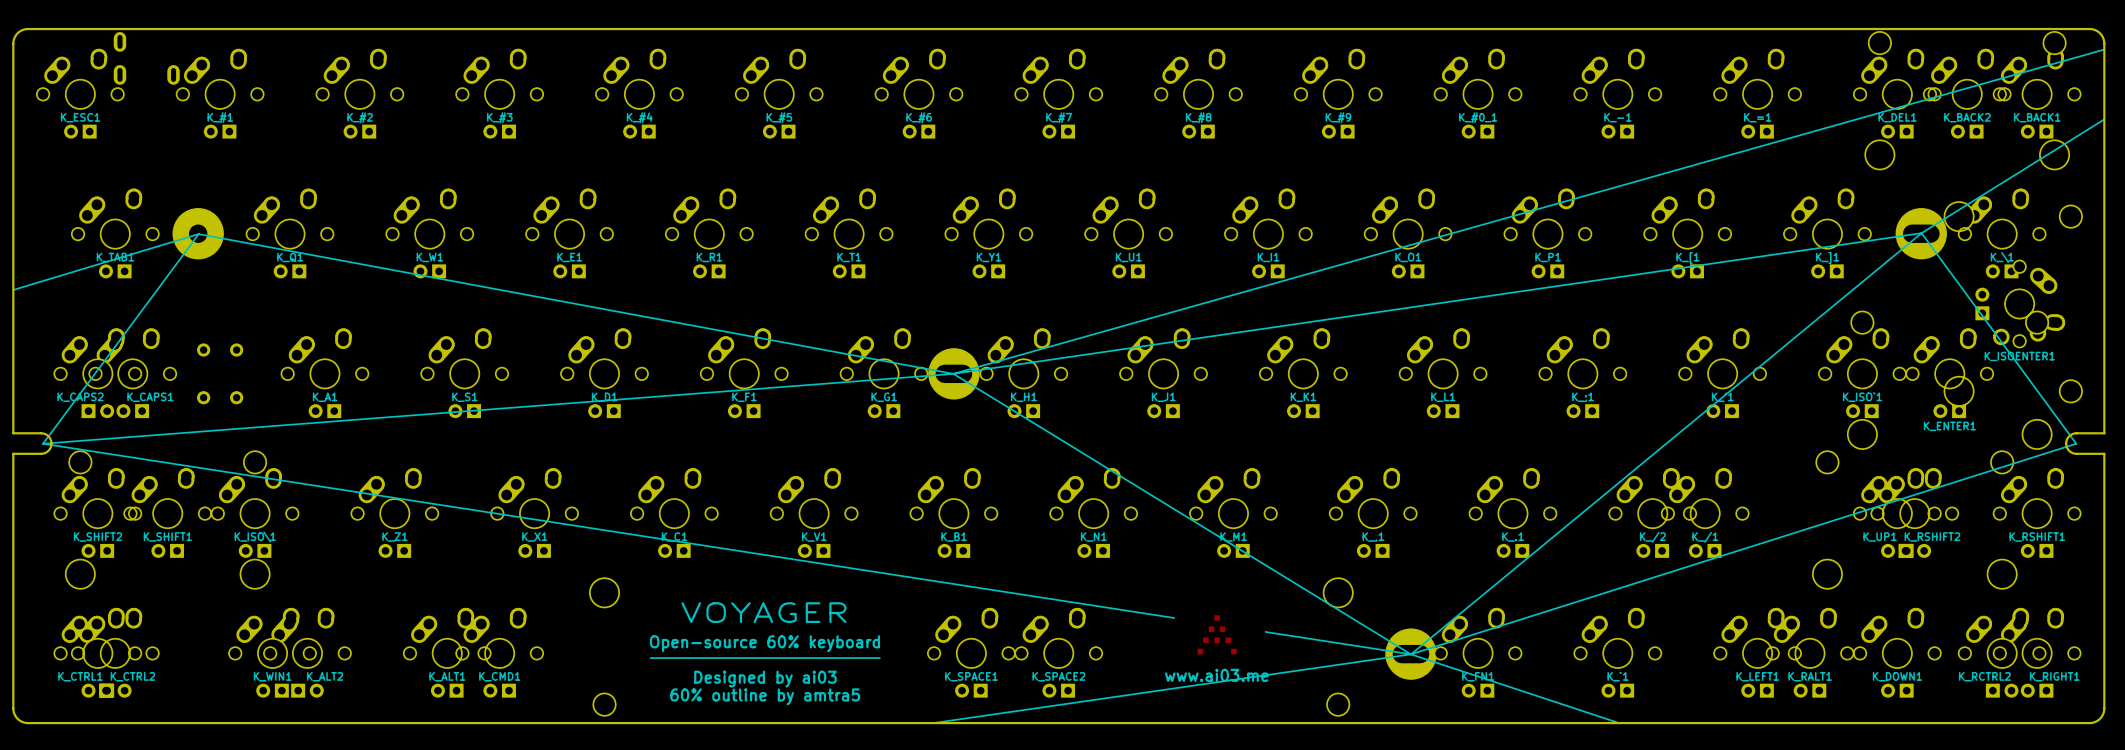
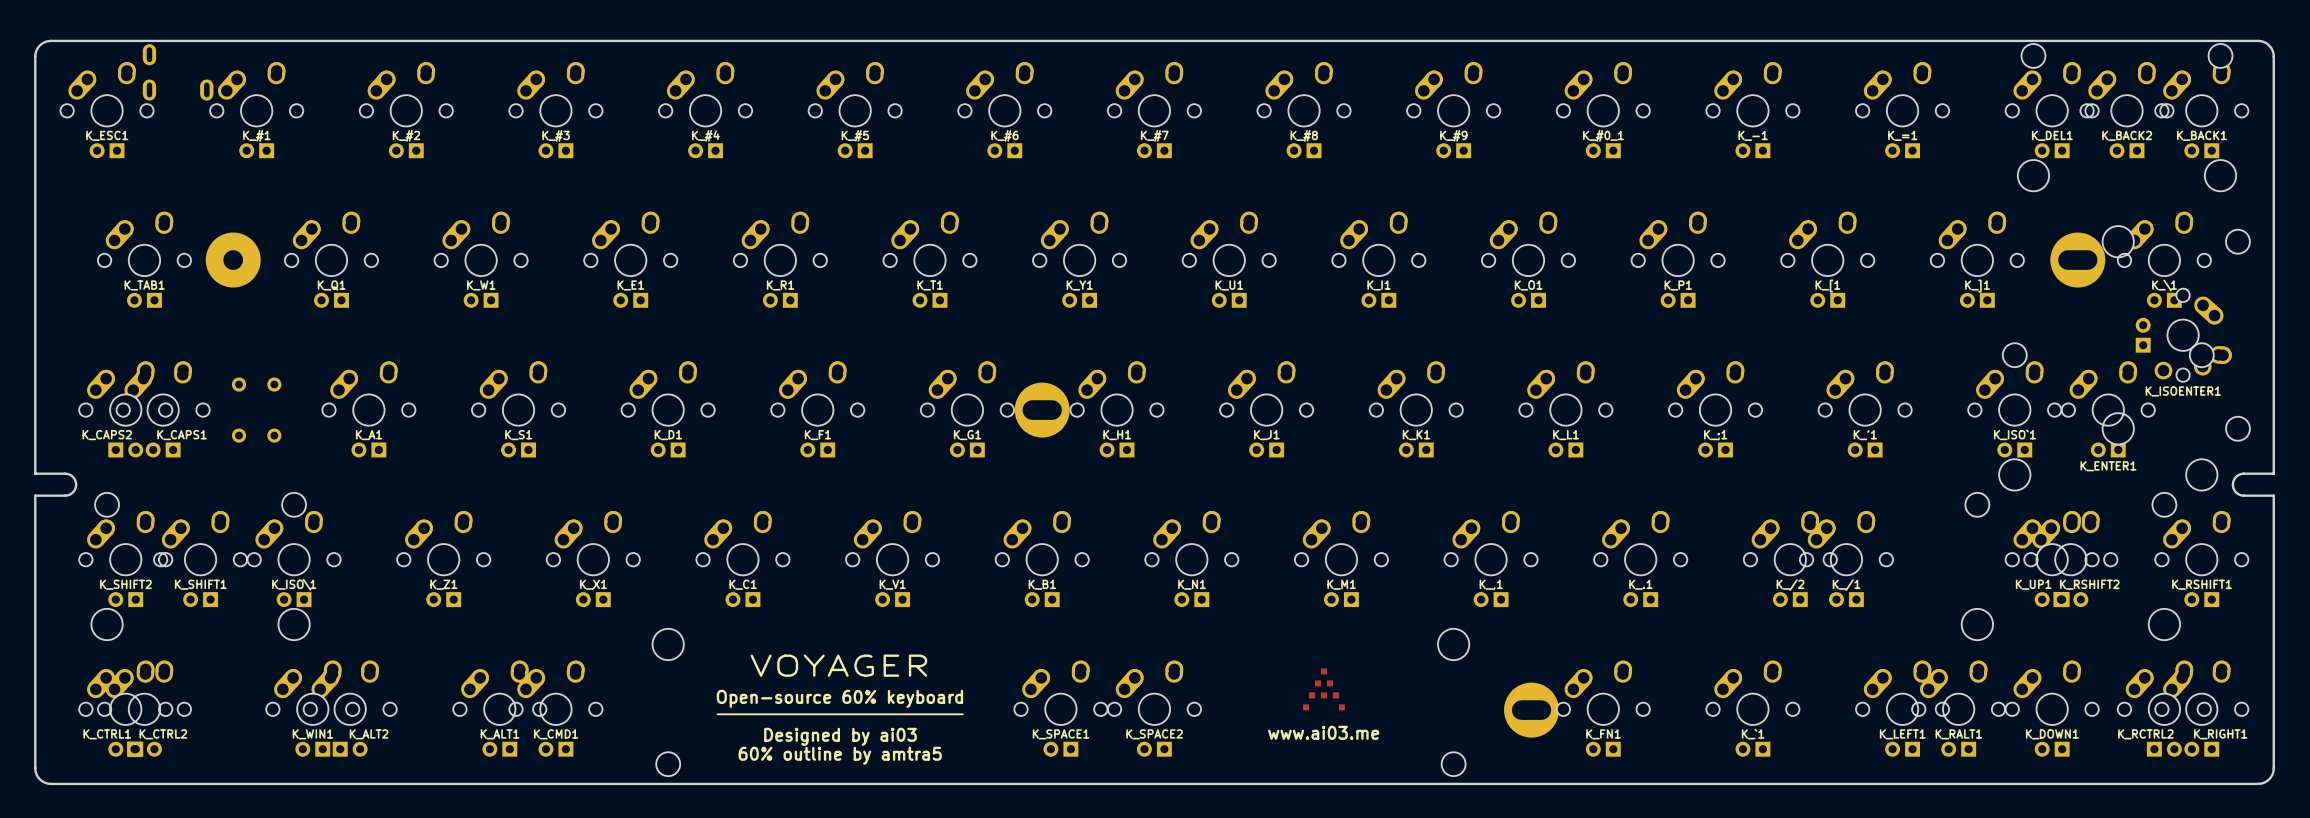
line: (2104, 49) (953, 373) -> none
line: (2104, 119) (1921, 233) -> none
line: (1921, 233) (953, 373) -> none
line: (1921, 233) (2076, 443) (1410, 654) -> none
line: (1921, 233) (1410, 654) -> none
line: (198, 234) (13, 289) -> none
line: (198, 234) (43, 443) -> none
line: (198, 234) (953, 373) -> none
line: (953, 373) (1410, 654) -> none
line: (953, 373) (43, 443) -> none
line: (43, 443) (1174, 617) -> none
line: (1265, 631) (1410, 654) -> none
line: (1410, 654) (932, 723) -> none
line: (1410, 654) (1619, 723) -> none

